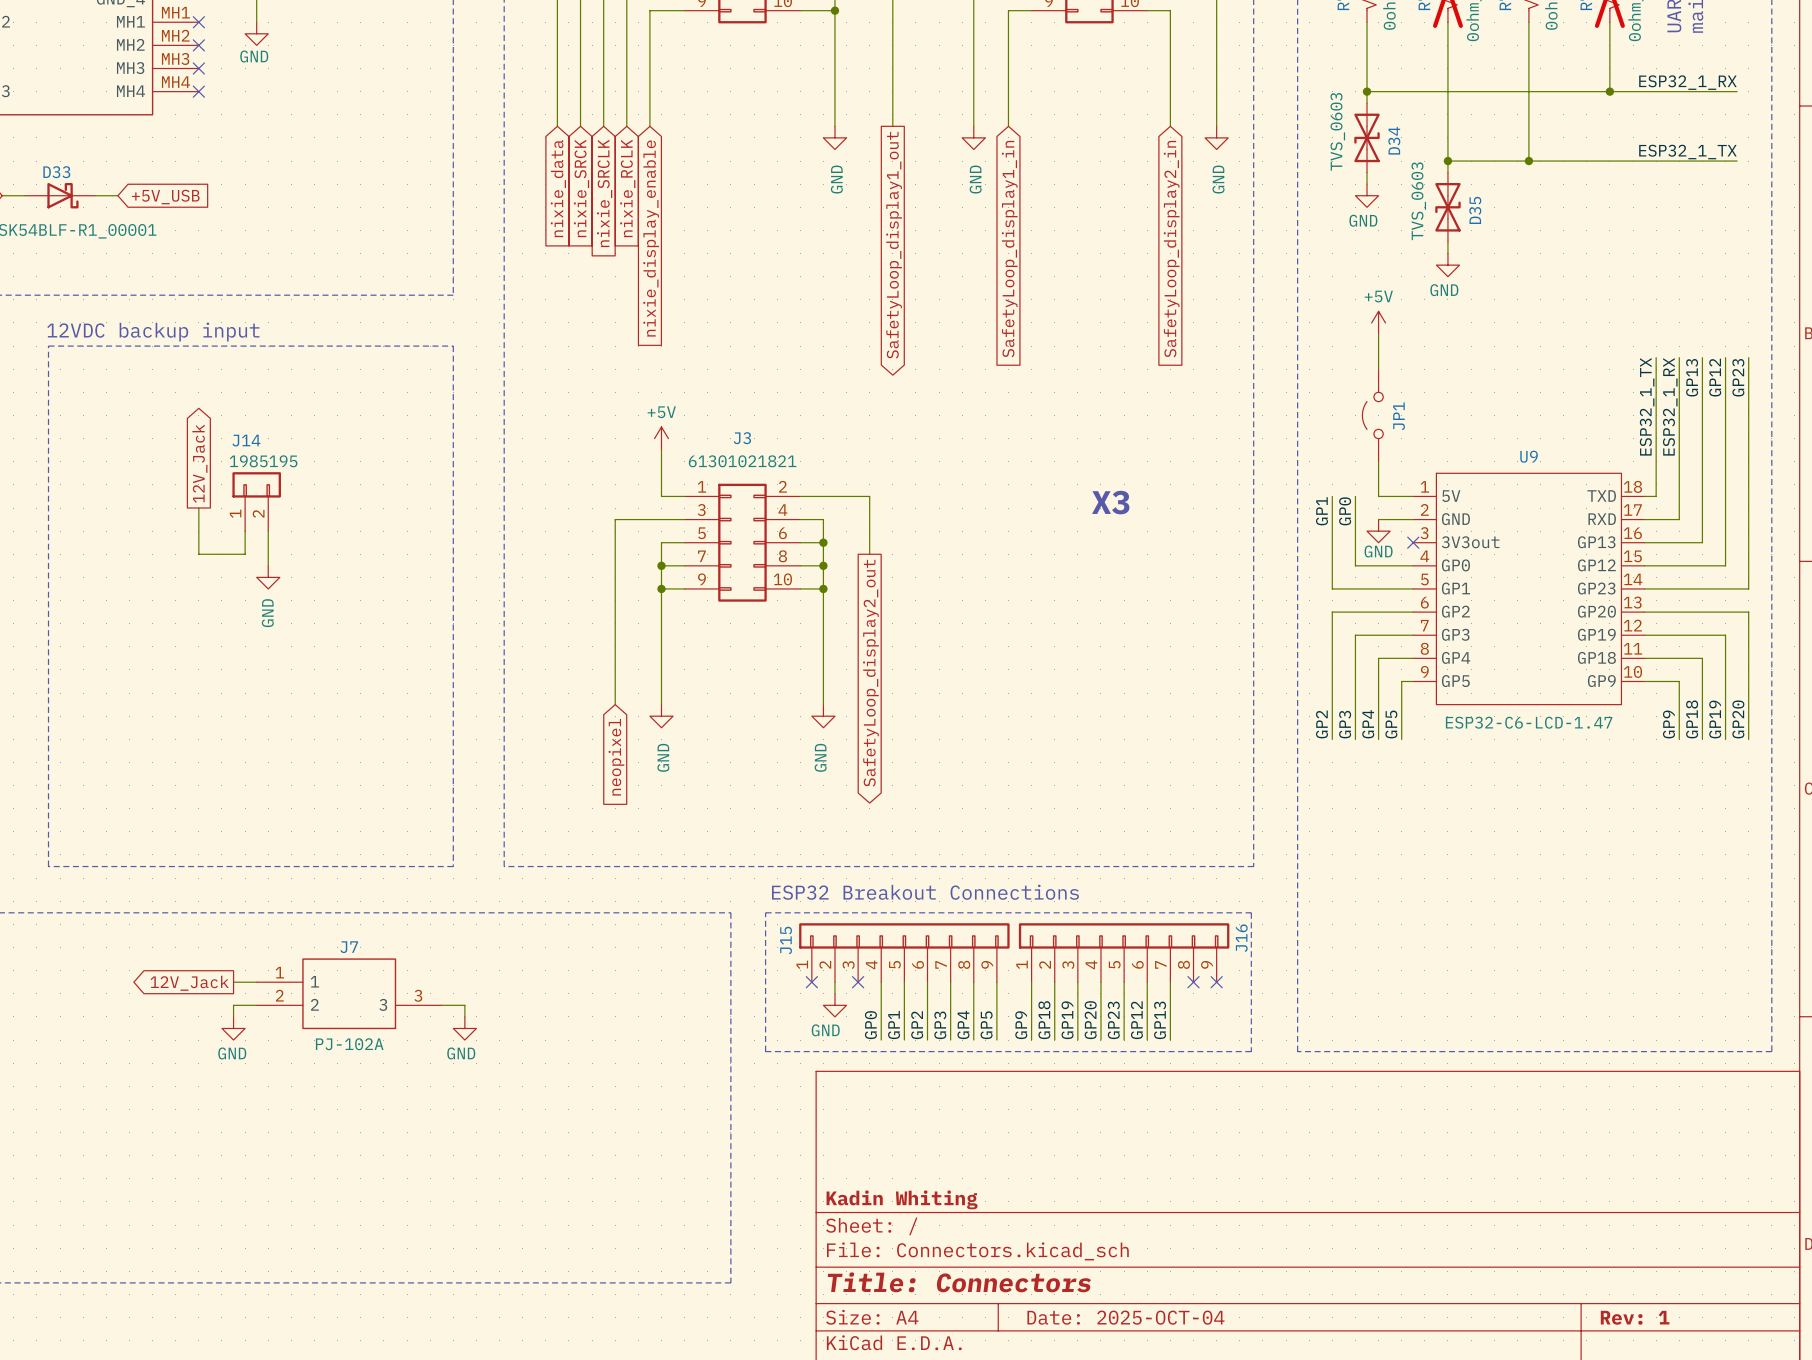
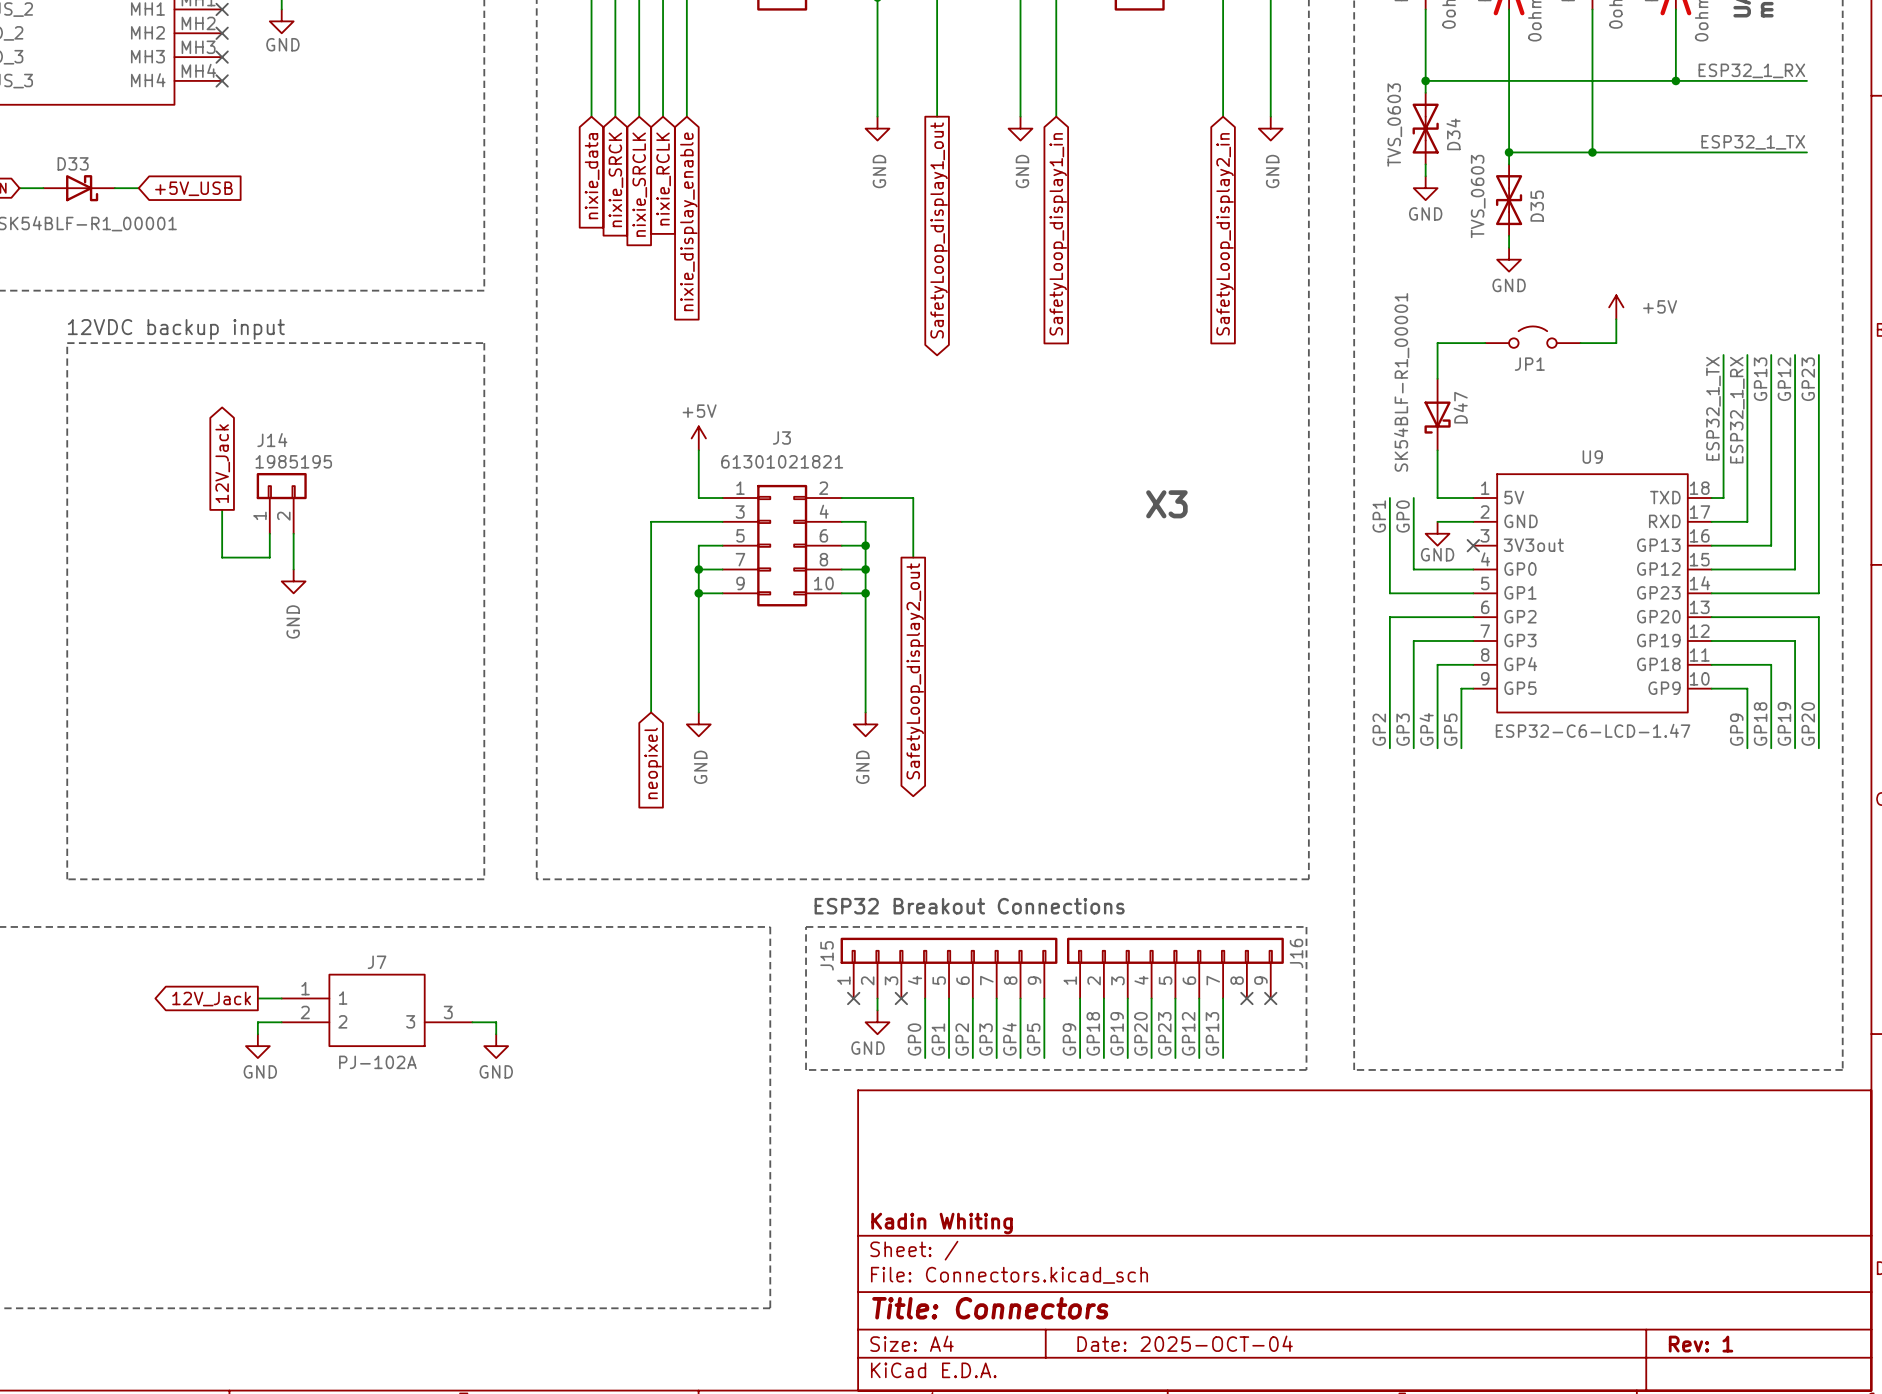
power symbol text position: +5V (1378, 296) -> +5V (1660, 306)
power symbol position: +5V (1378, 322) -> +5V (1616, 307)
wire: none -> (1616, 319) (1616, 343) (1580, 343)
wire: (1378, 334) (1378, 346) -> (1485, 343) (1437, 343)
JP1 rotation: 0° (1372, 415) -> 90° clockwise (1532, 337)
JP1 position: (1372, 415) -> (1532, 337)
D47: none -> SK54BLF-R1_00001 (1437, 414)

